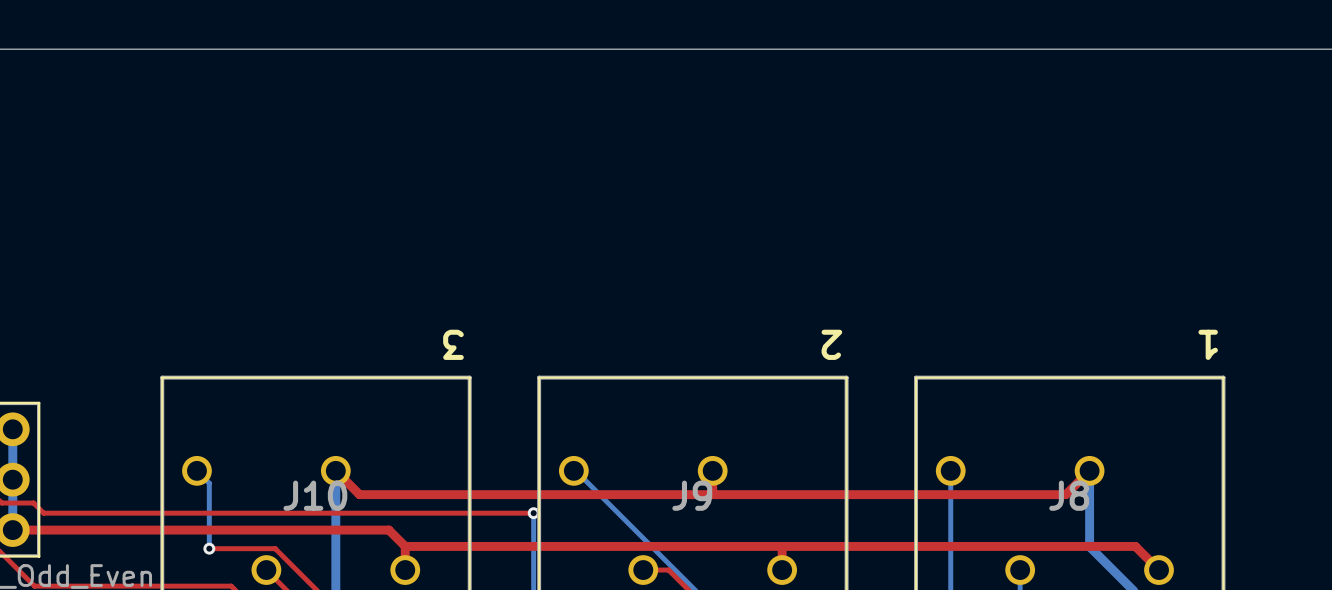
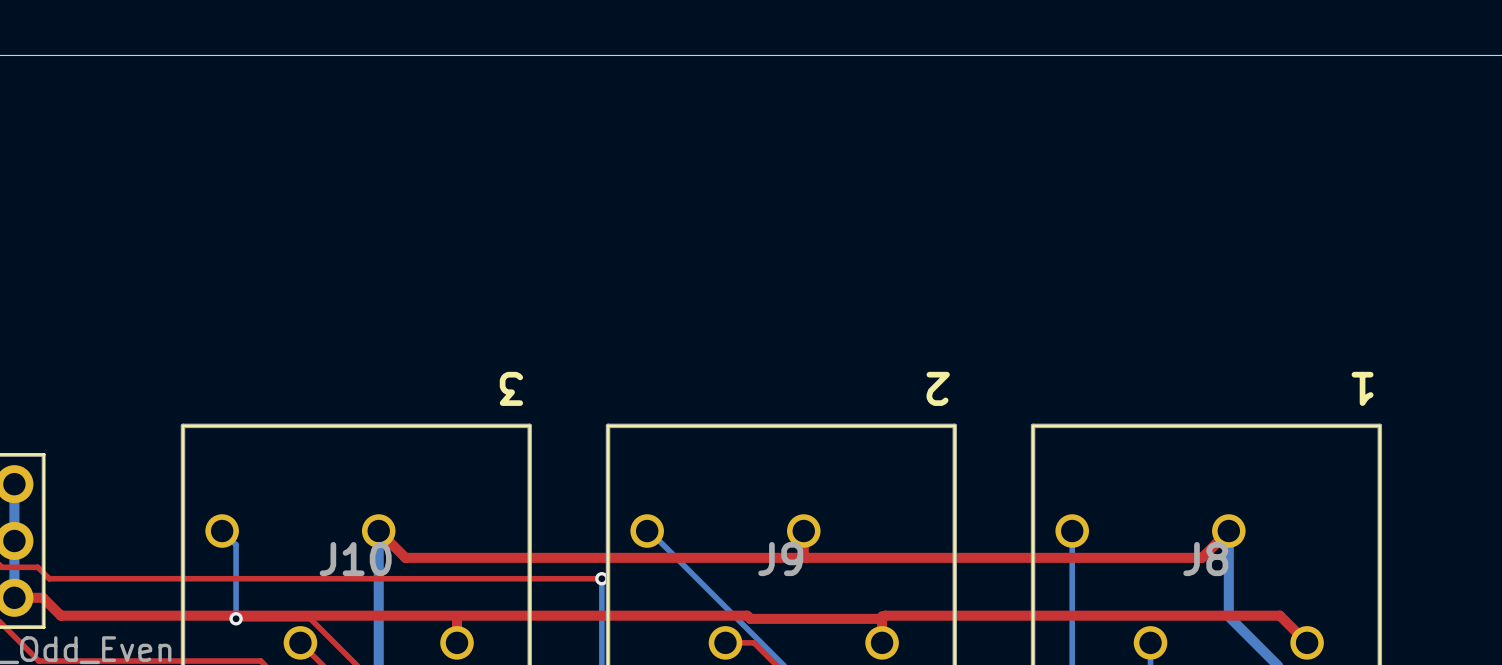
top track: (38, 530) (388, 530) (405, 546) (1135, 546) -> (42, 597) (60, 615) (747, 615) (750, 618) (882, 618) (885, 615) (1280, 616)

